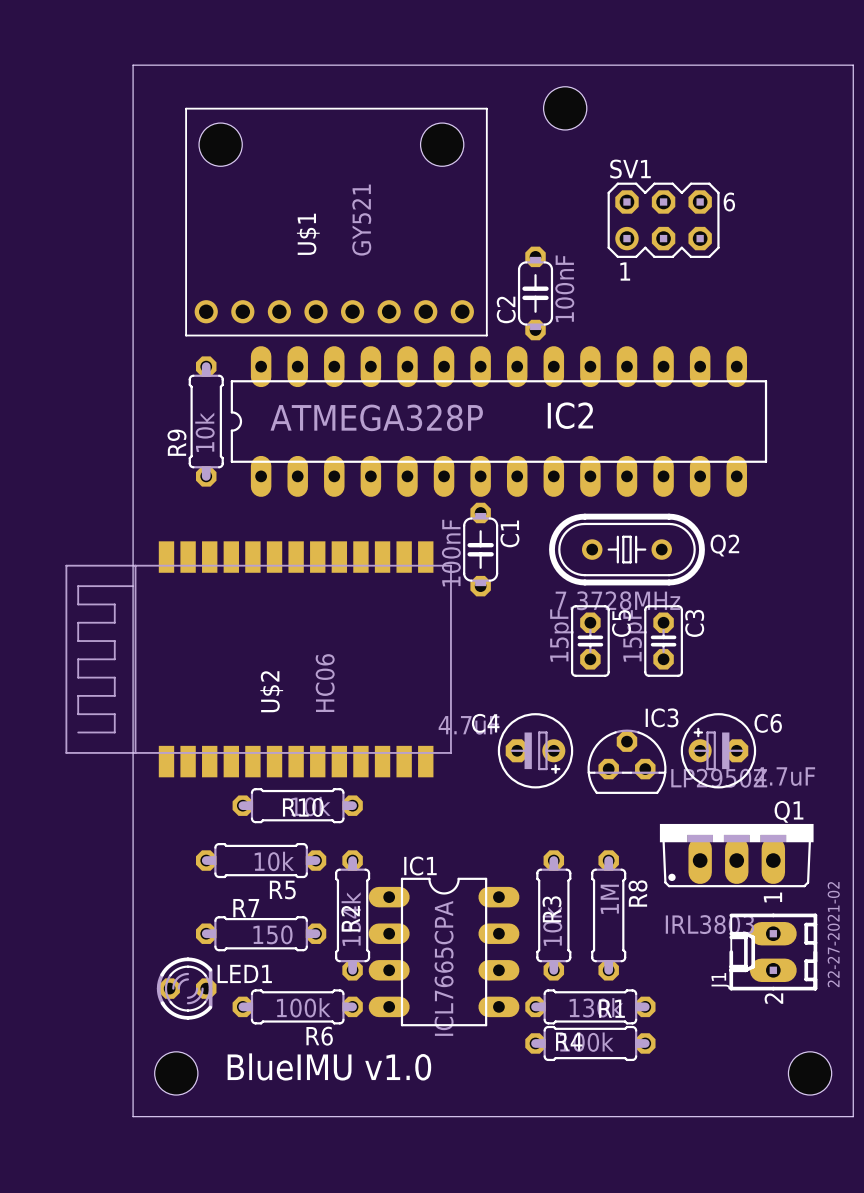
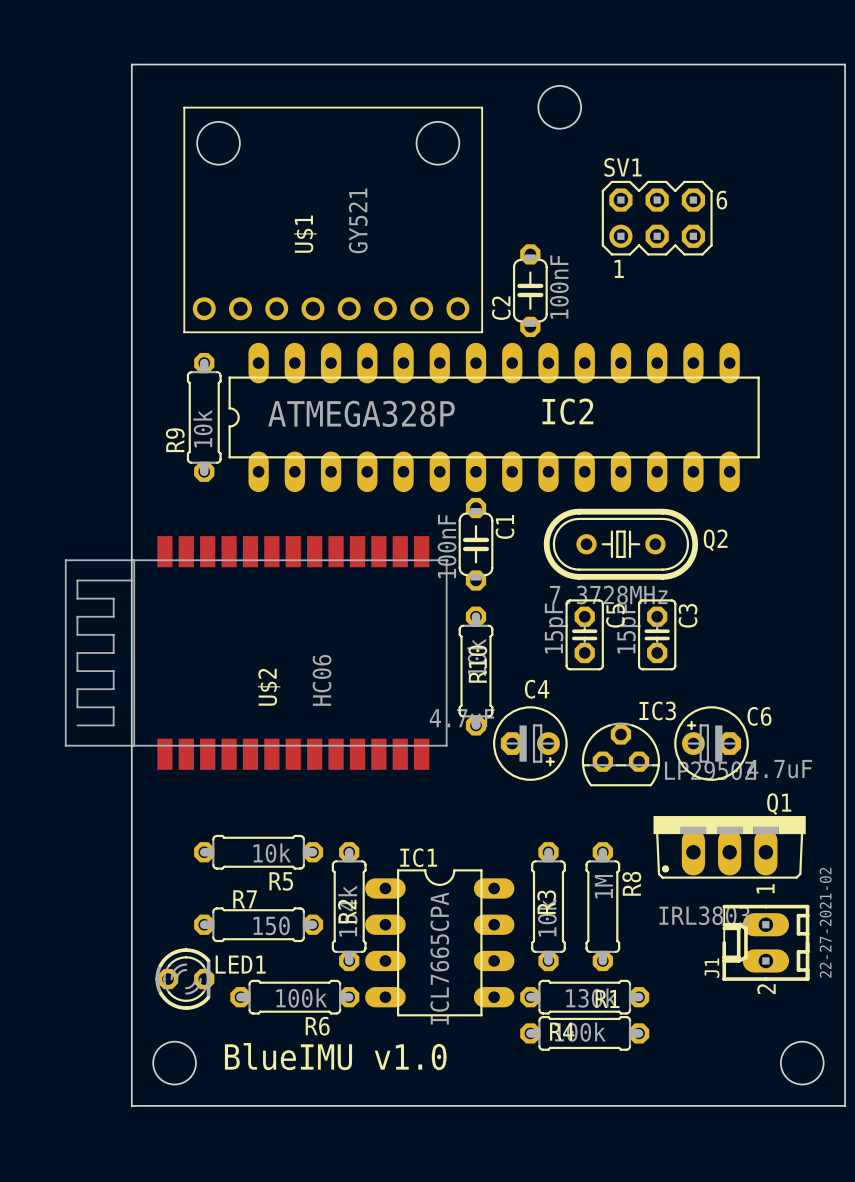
C4 name position: C4 (485, 723) -> C4 (537, 689)
R10 rotation: 0° (297, 805) -> 90° clockwise (476, 671)
R10 position: (297, 805) -> (476, 671)

